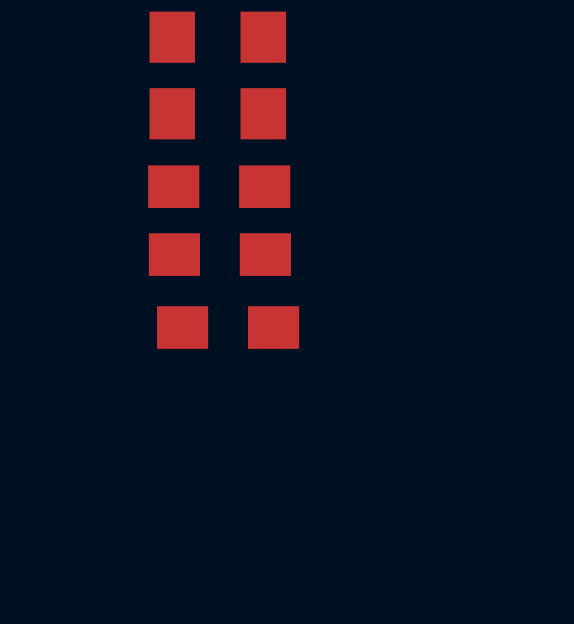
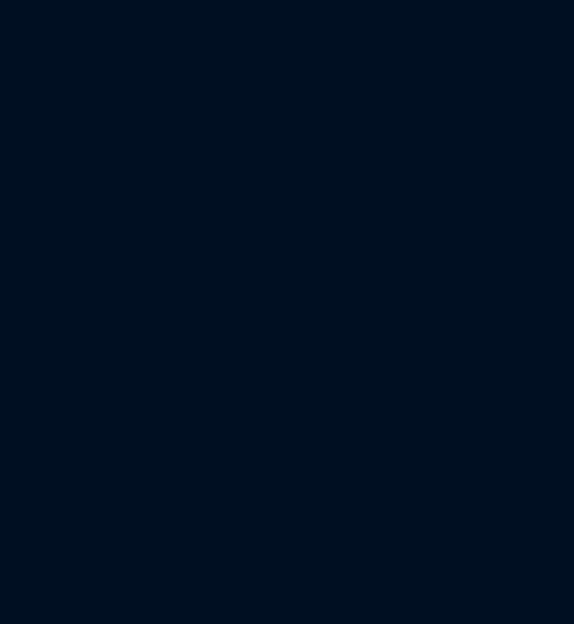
part: (217, 37) -> none
part: (217, 113) -> none
part: (219, 186) -> none
part: (219, 254) -> none
part: (228, 327) -> none

